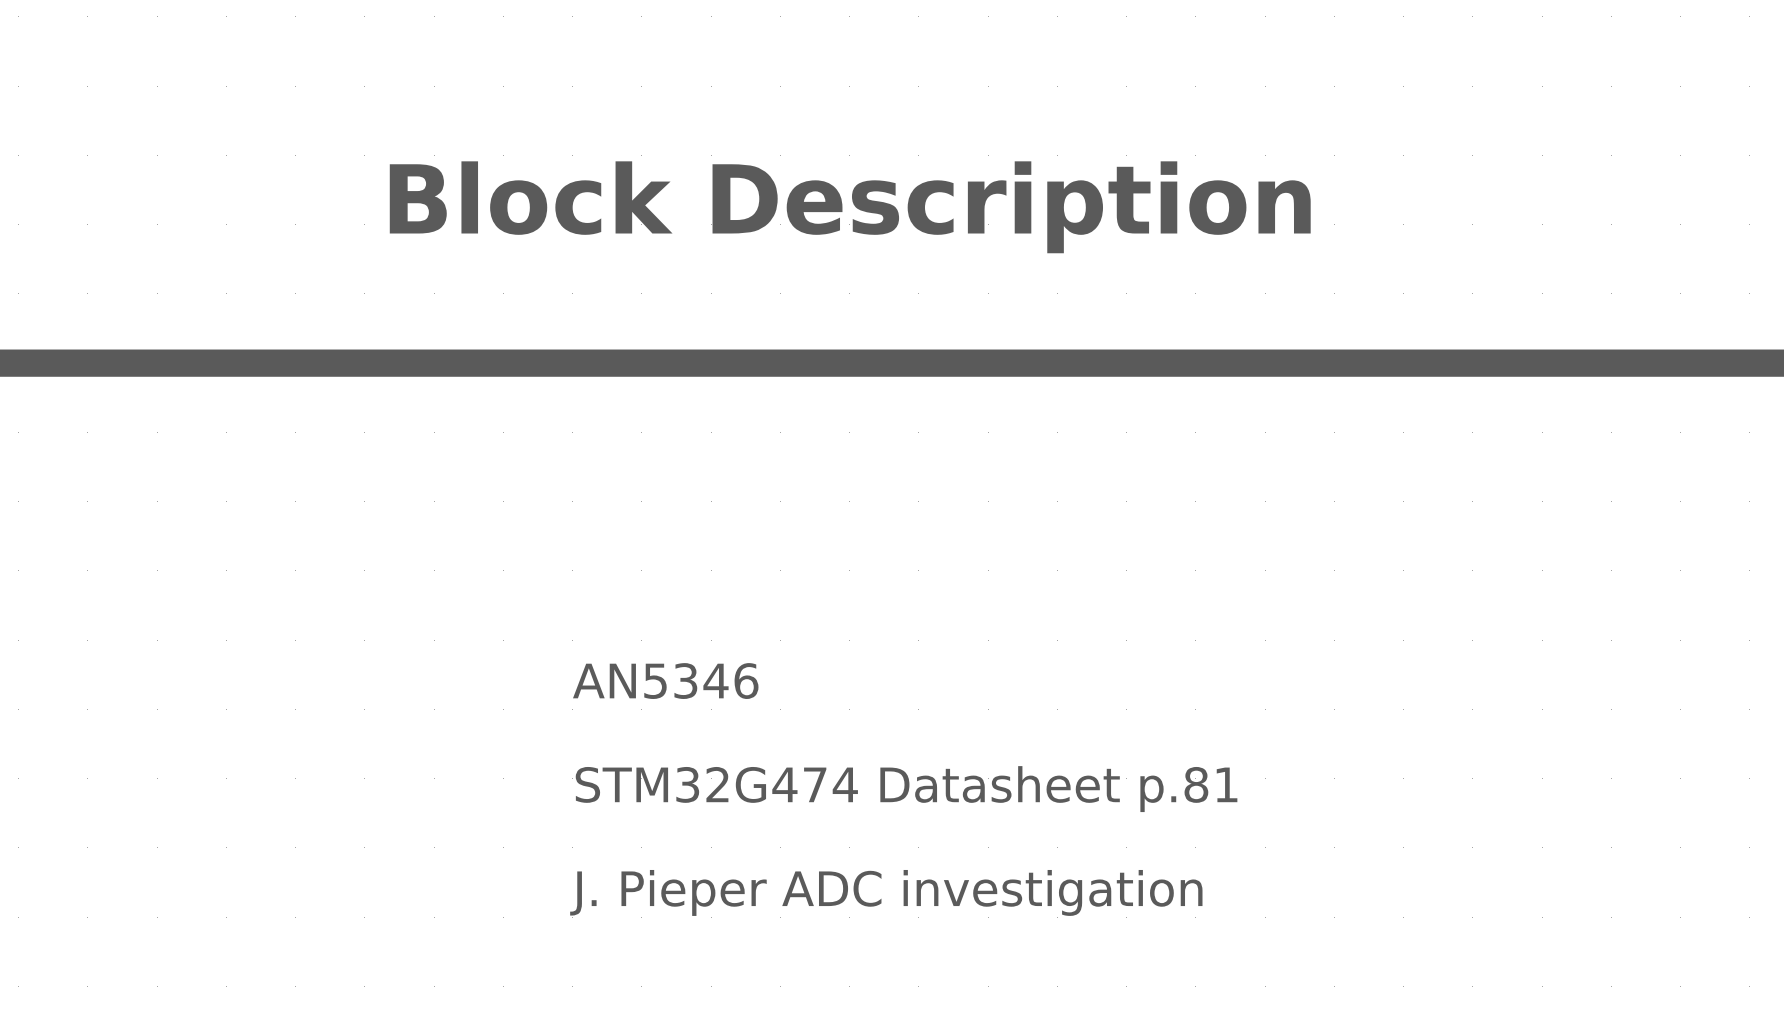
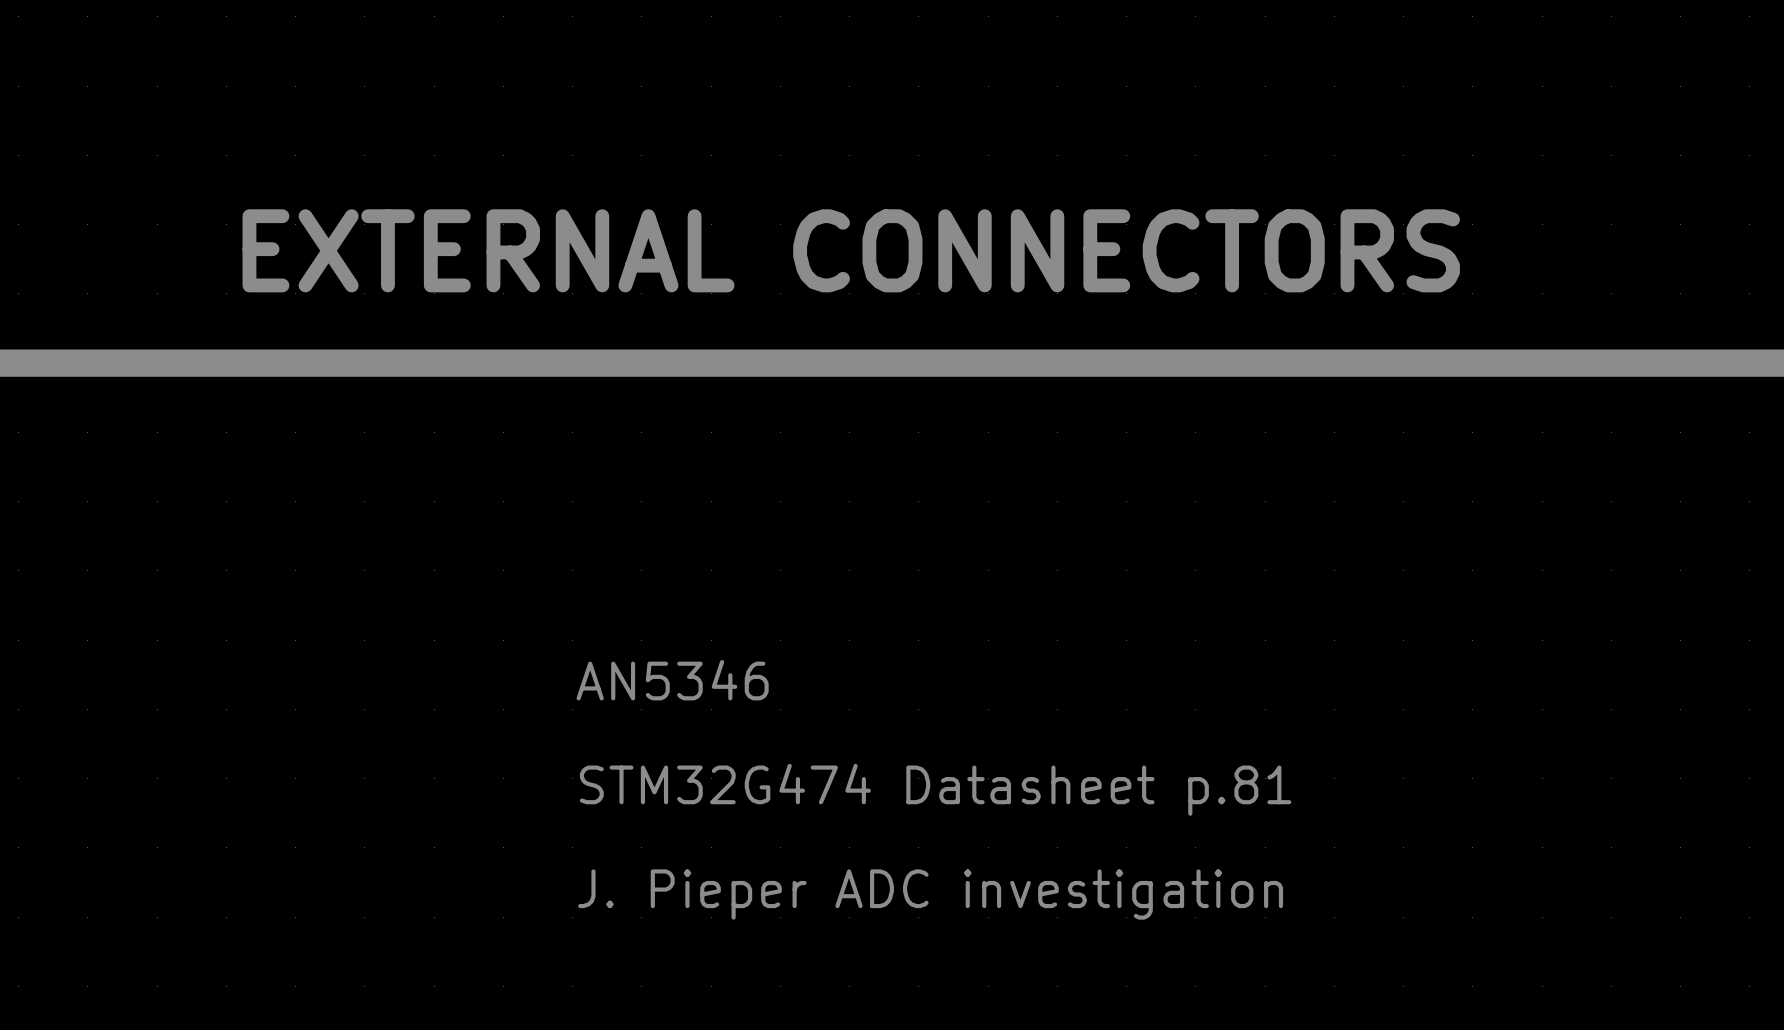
text: Block Description (850, 207) -> none
text: none -> EXTERNAL CONNECTORS (851, 250)

